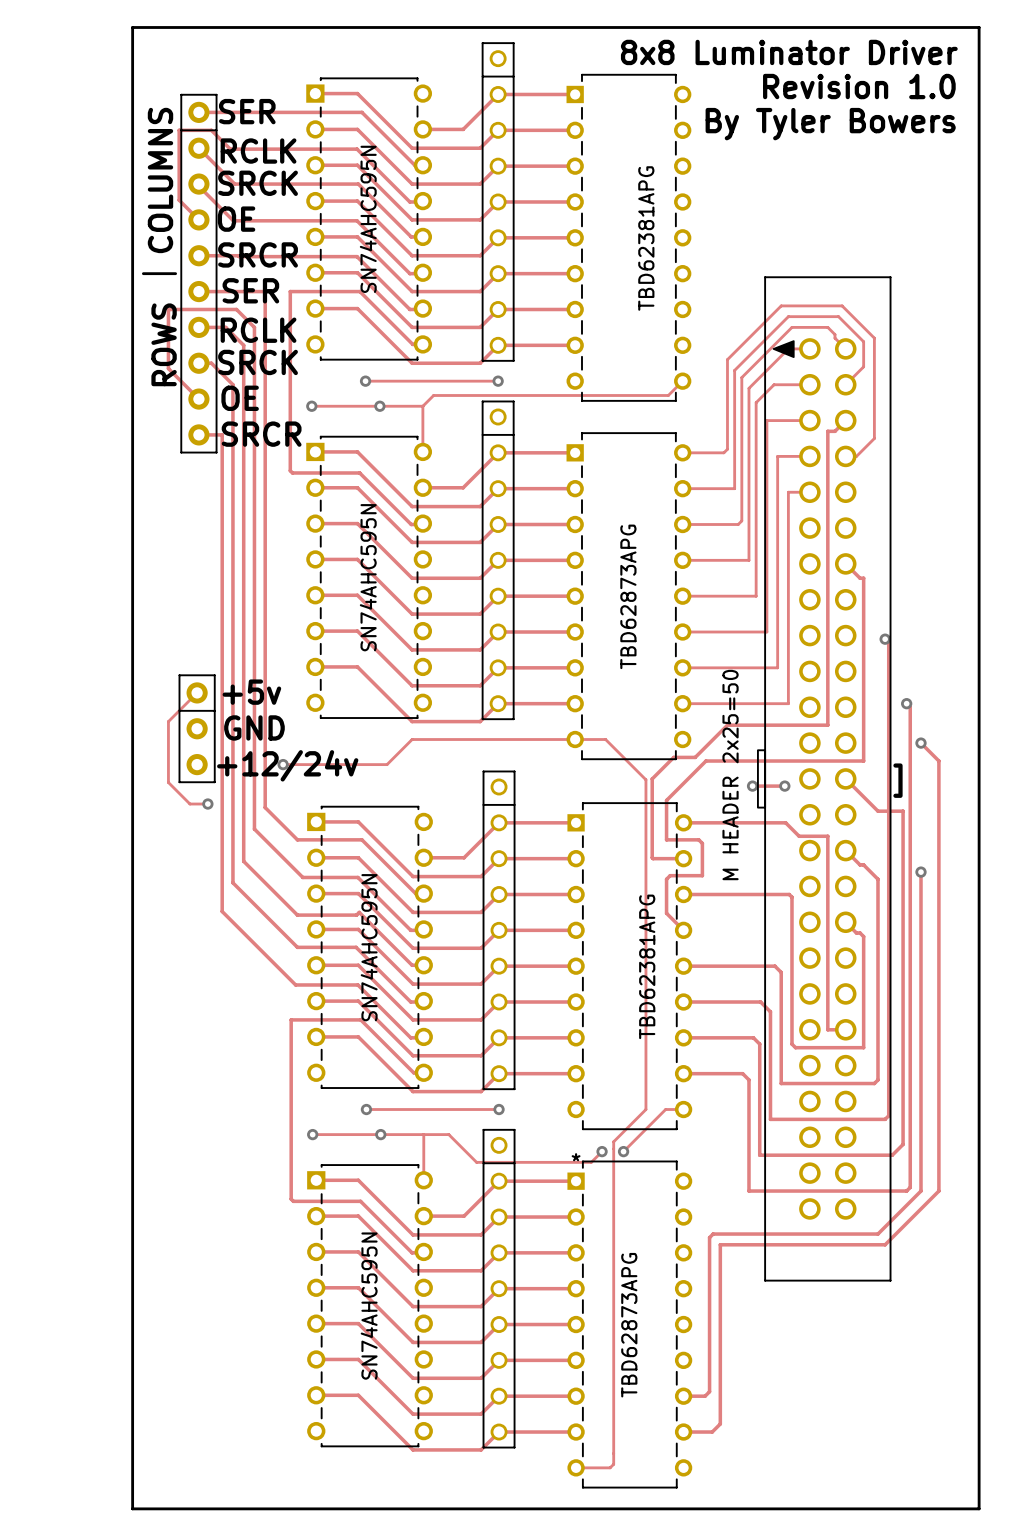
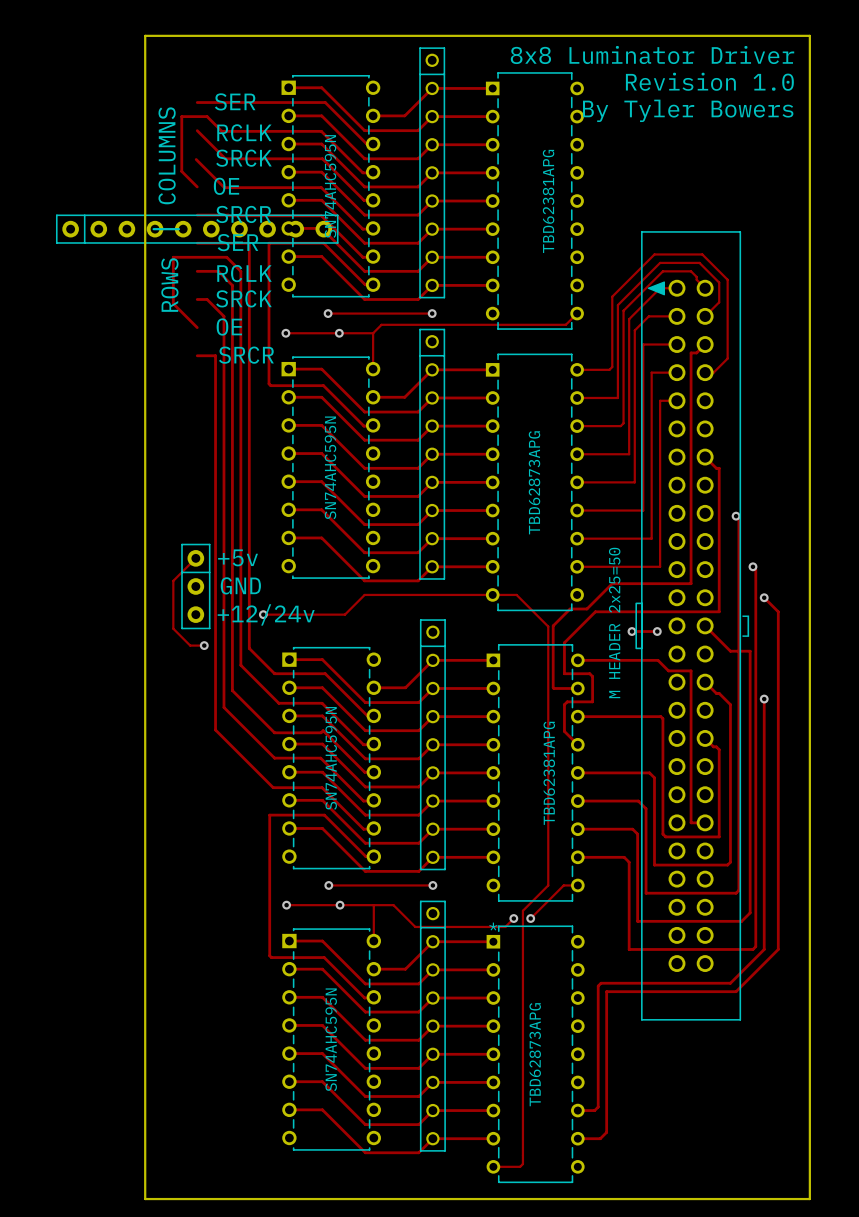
part rotation: 0° (198, 273) -> 90° counterclockwise (197, 229)

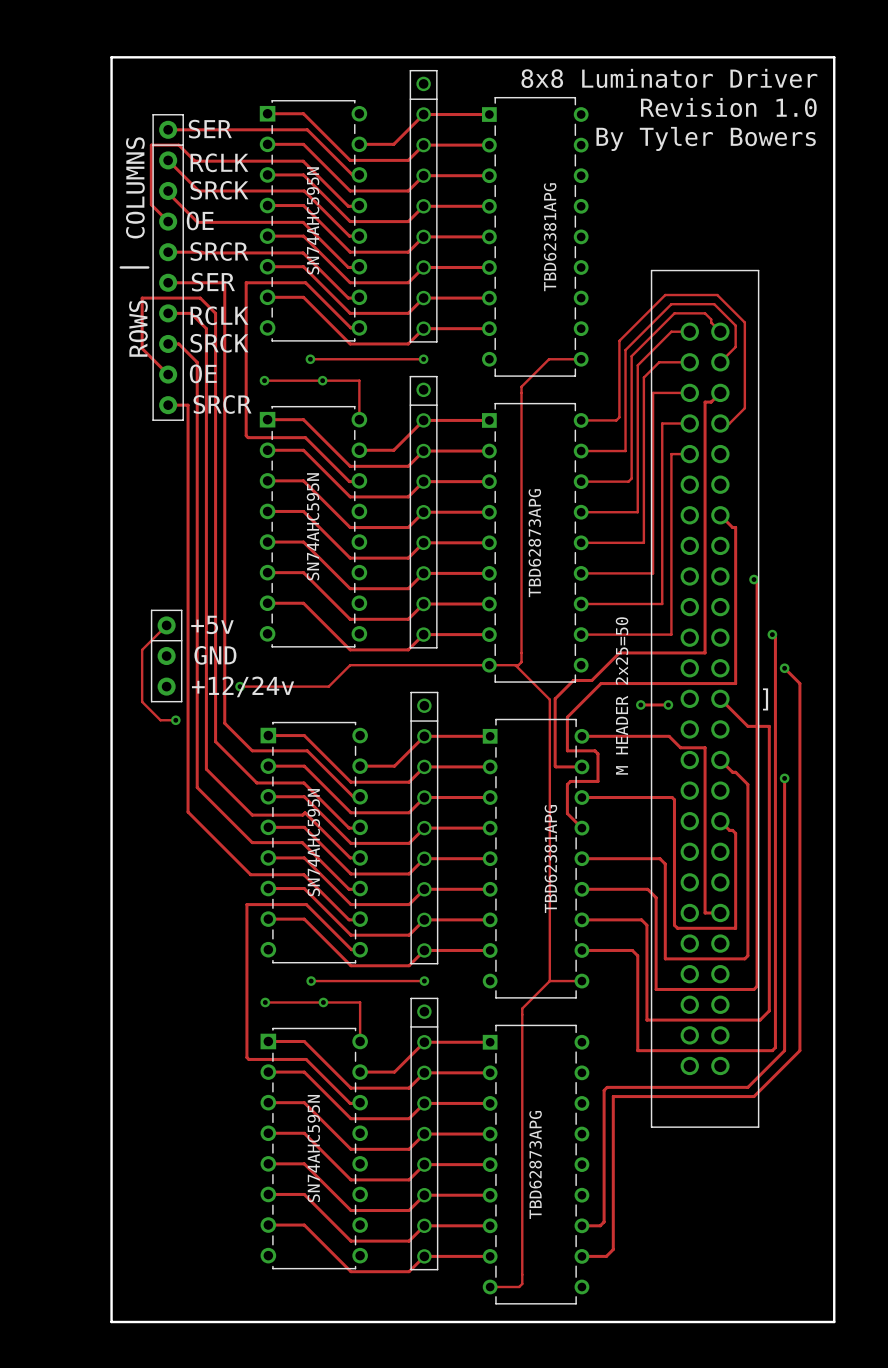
part rotation: 0° (197, 229) -> 90° clockwise (168, 267)
part footprint: [635, 231, 741, 1021] -> [650, 269, 760, 1128]
track: (577, 313) (565, 324) (381, 324) (373, 333) -> (581, 359) (549, 359) (521, 386) (521, 662) (515, 665)
track: (563, 885) (530, 918) -> (566, 981) (549, 981)
track: (373, 905) (393, 905) (415, 926) (505, 926) (513, 918) -> none
via: (513, 918) -> none
via: (530, 918) -> none
part text: * (493, 926) -> none

